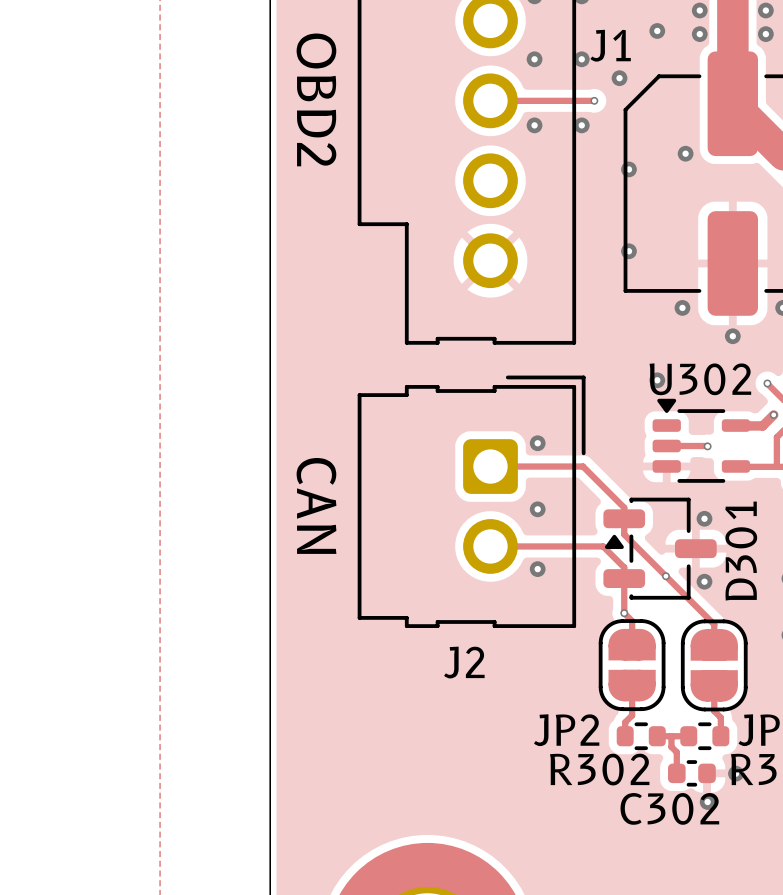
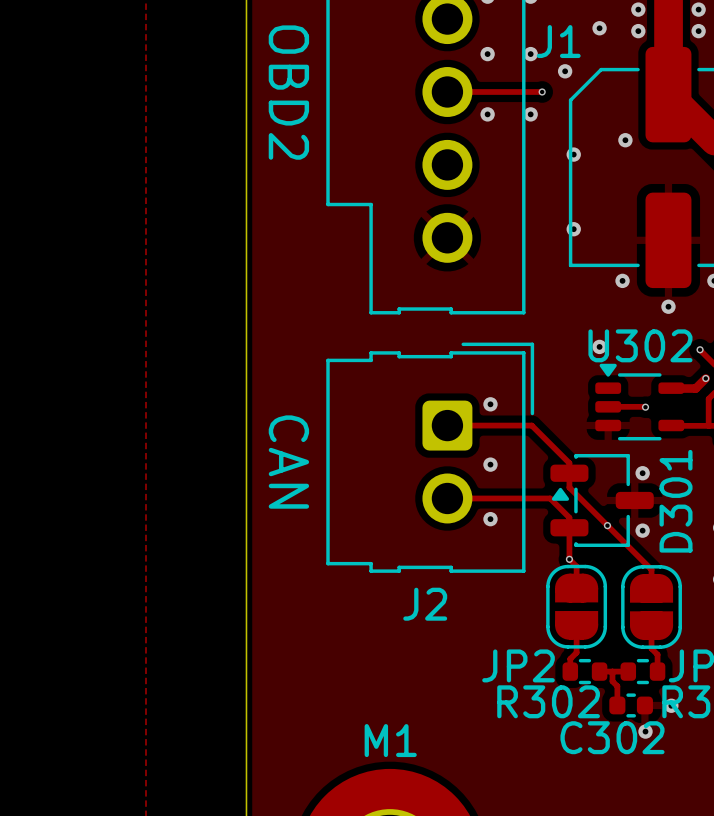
M1 name: none -> M1 (390, 740)

